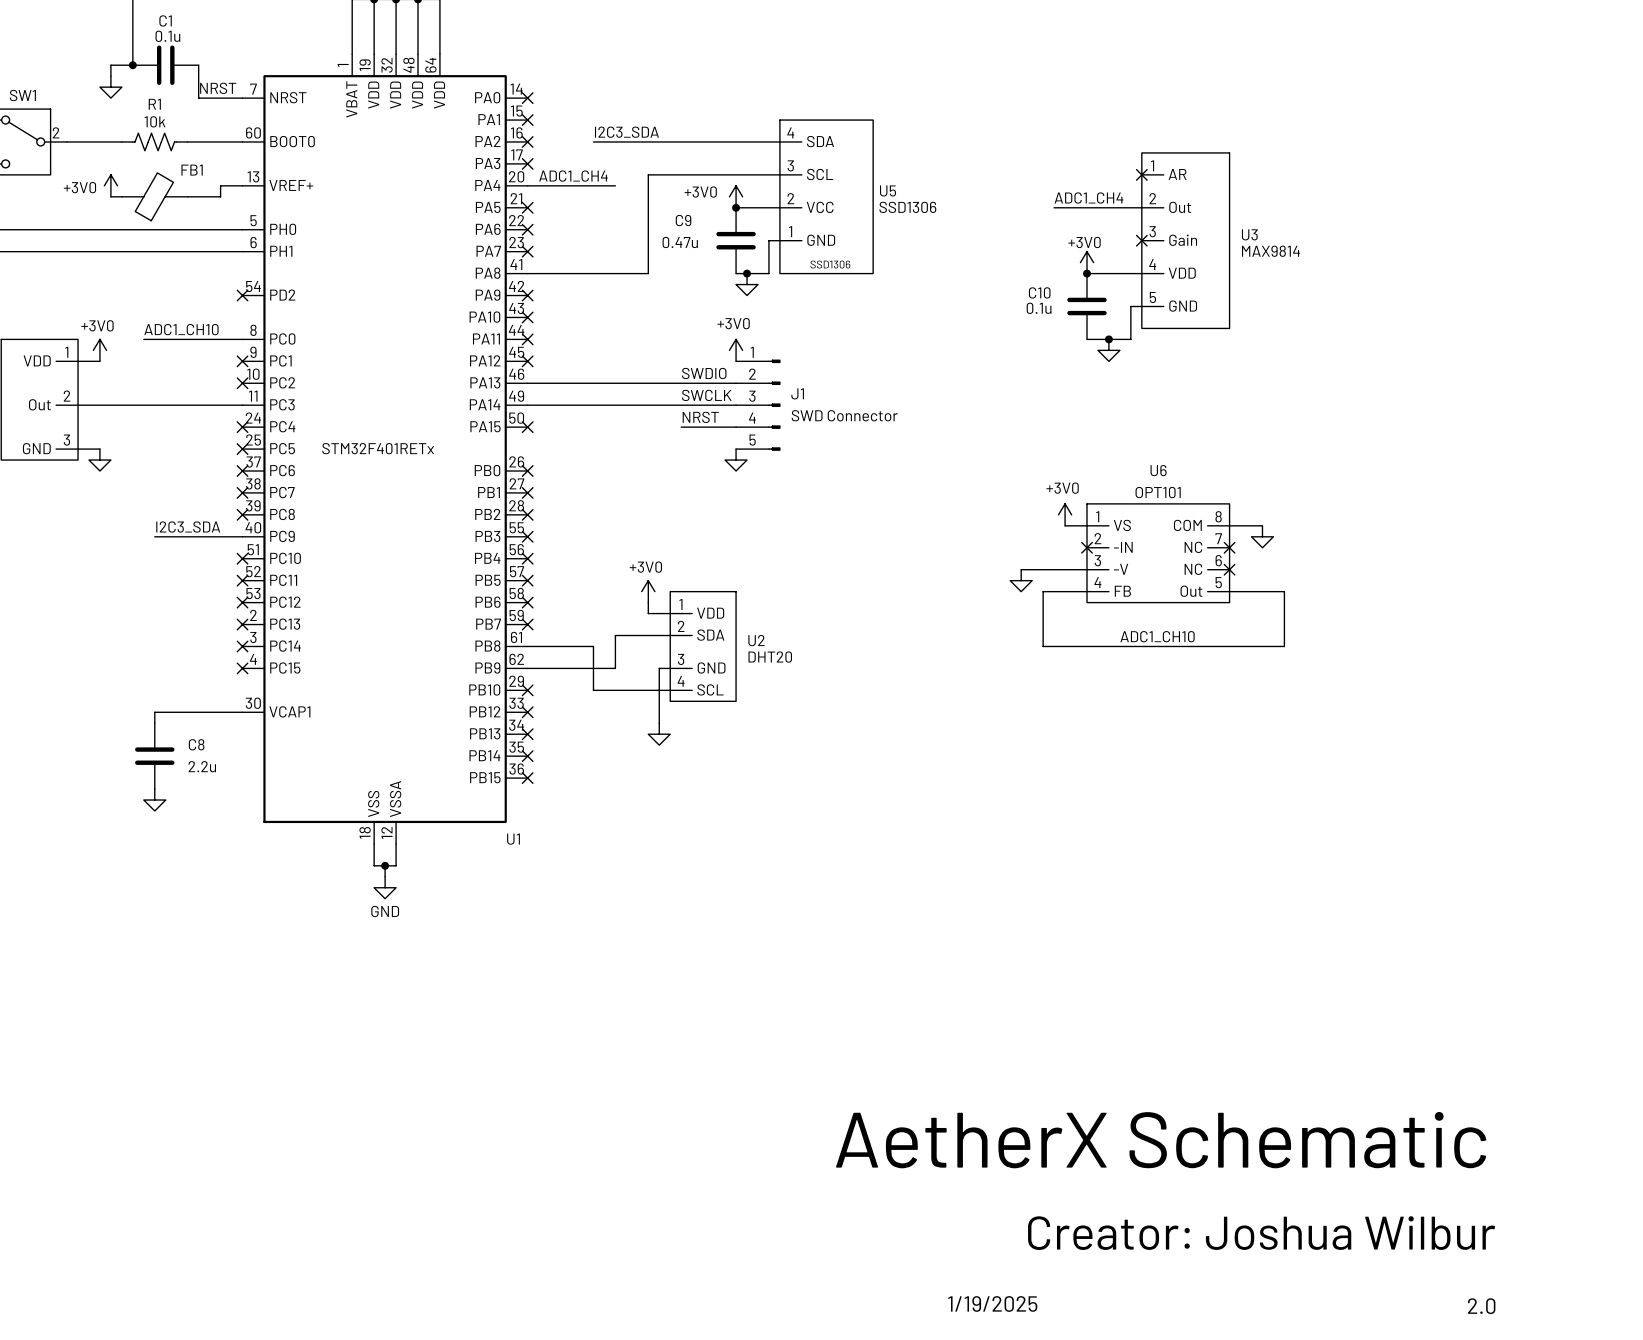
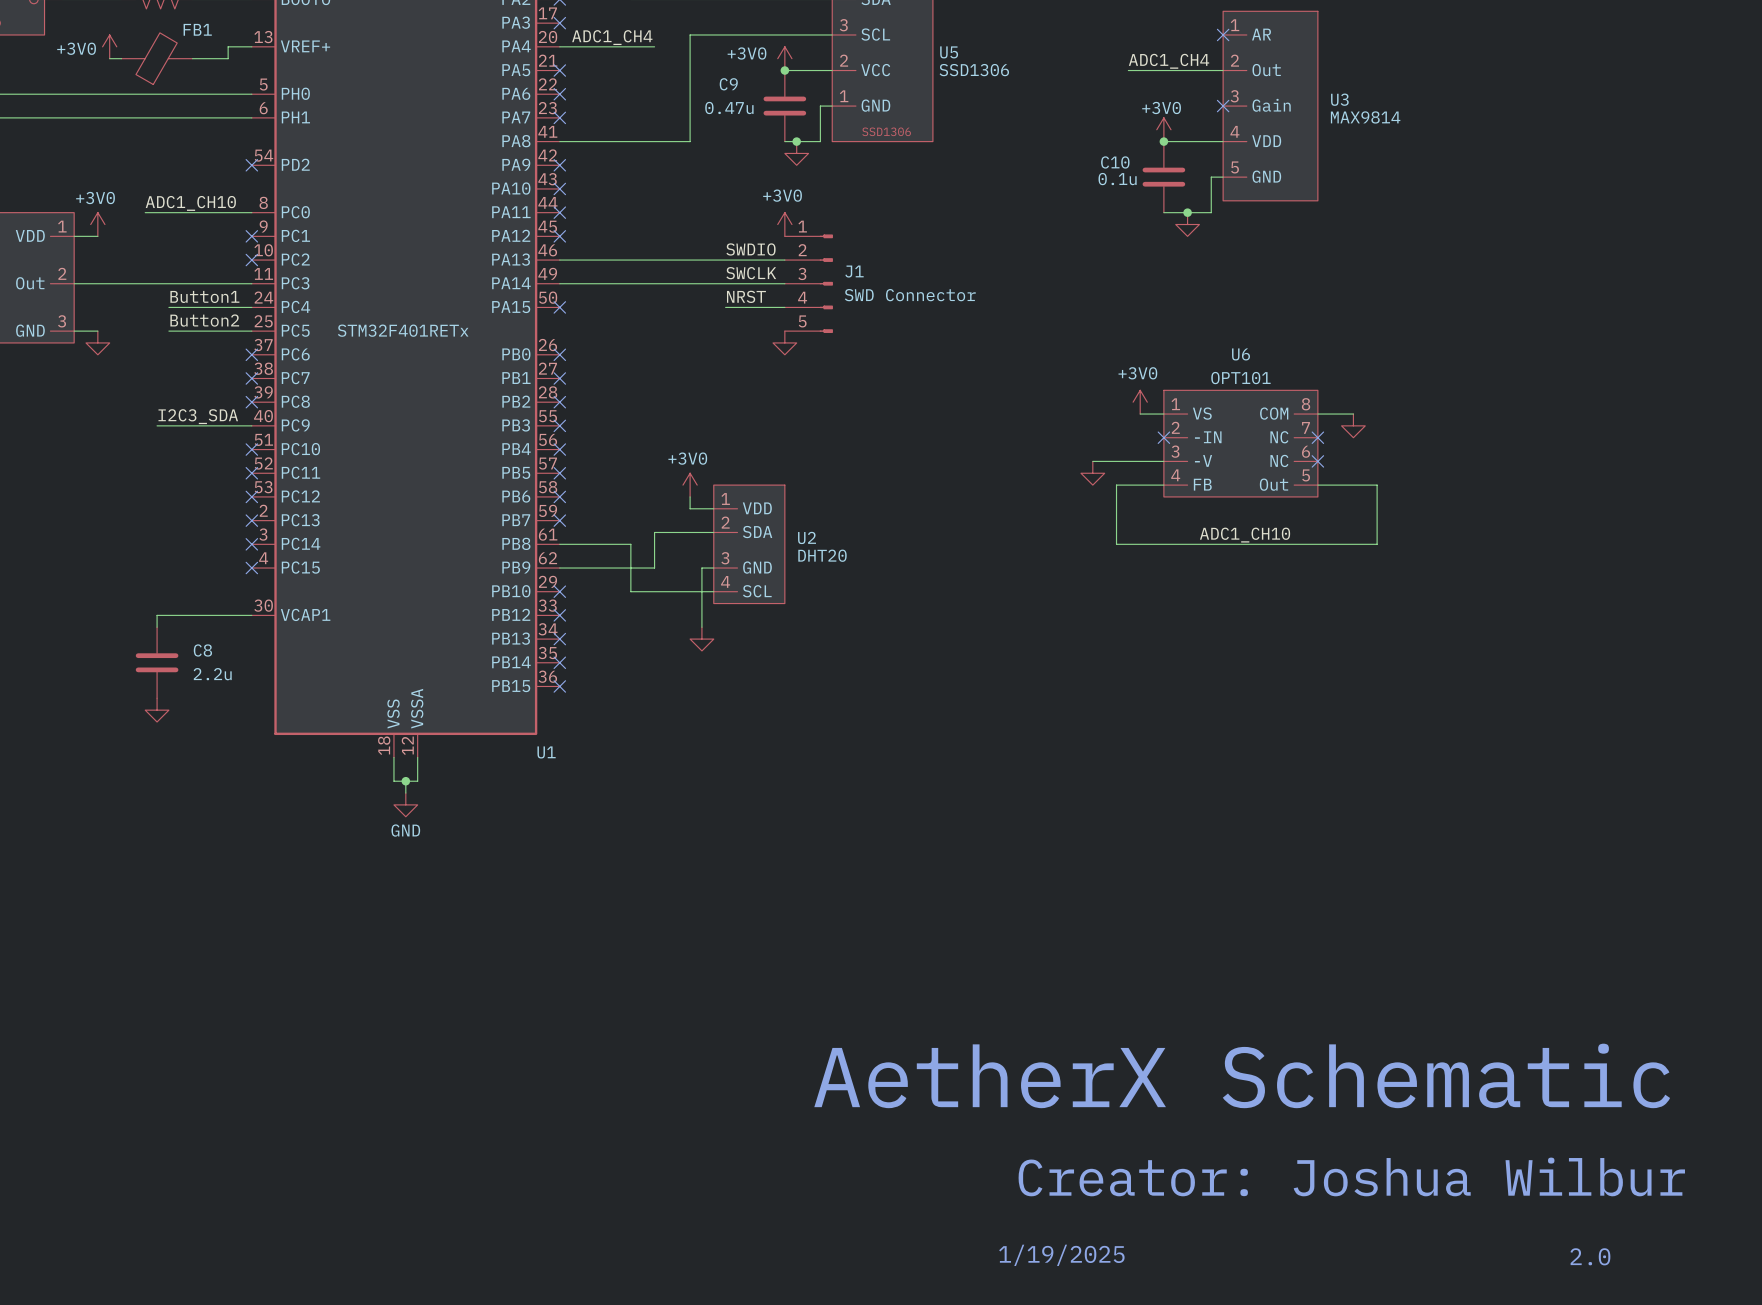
label: none -> Button1 (204, 296)
wire: none -> (168, 307) (251, 307)
no-connect mark: (242, 427) -> none
label: none -> Button2 (204, 320)
wire: none -> (168, 331) (251, 331)
no-connect mark: (242, 449) -> none

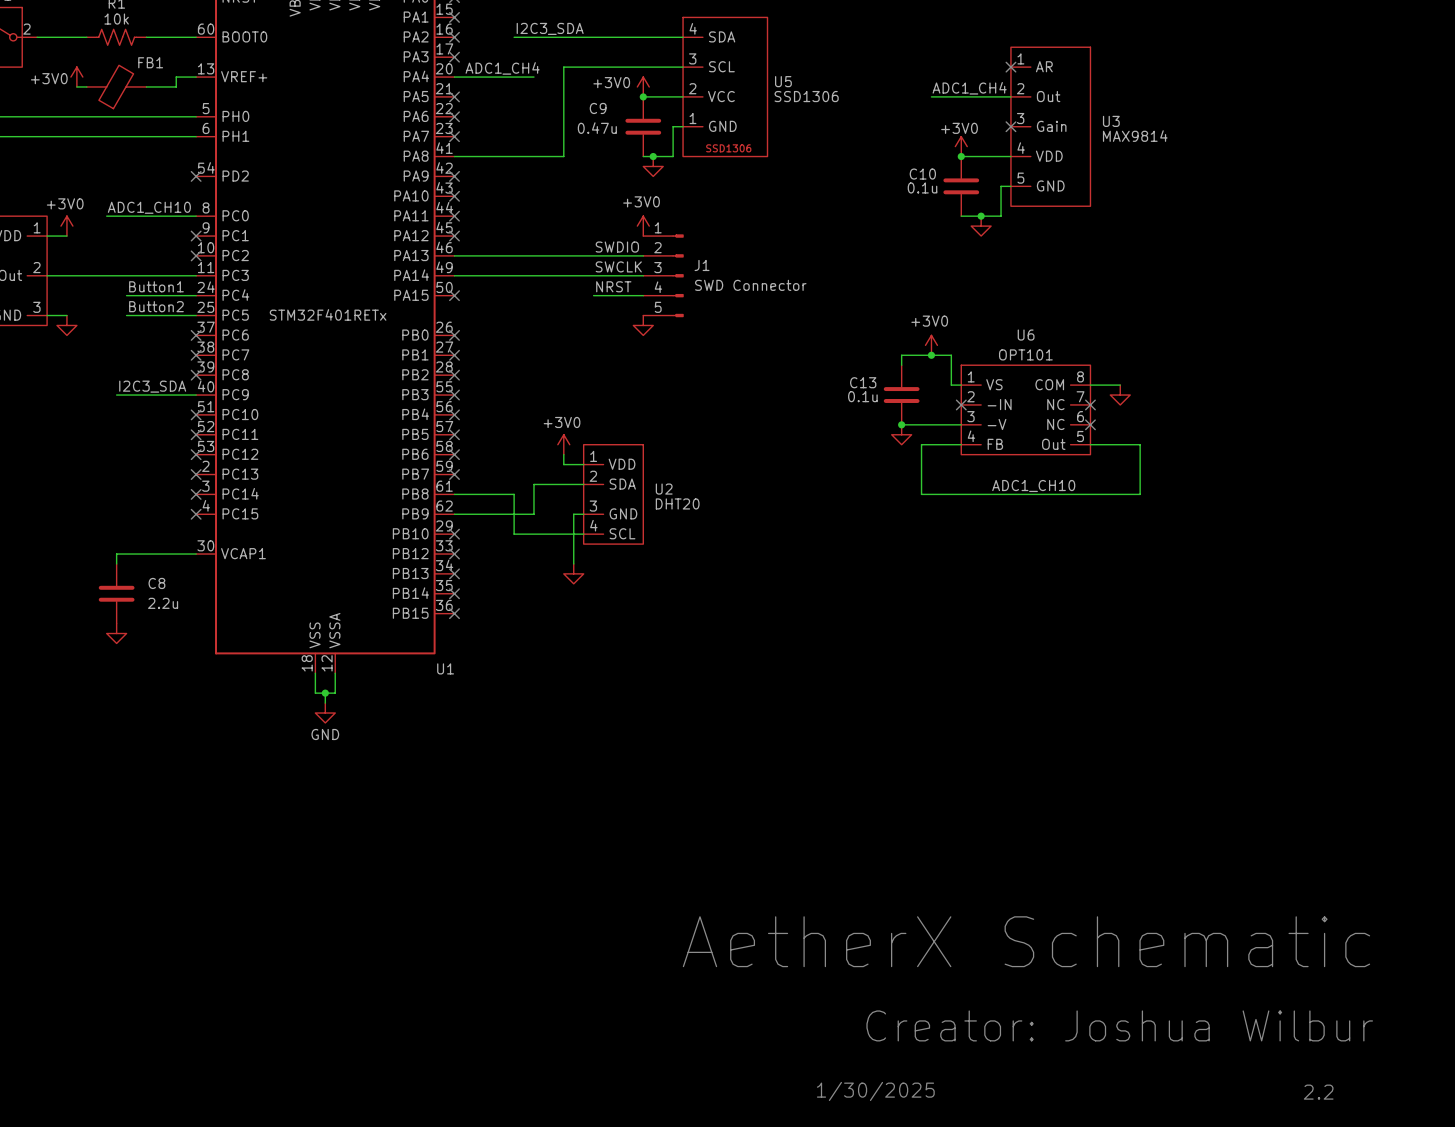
junction: none -> (931, 355)
power symbol position: +3V0 (1140, 402) -> +3V0 (931, 345)
wire: (1140, 414) (1152, 414) -> (901, 365) (901, 355) (951, 355) (951, 385)
C13: none -> 0.1u (901, 395)
junction: none -> (901, 424)
text: 1/19/2025 (1061, 1255) -> 1/30/2025 (875, 1091)
text: 2.0 (1590, 1256) -> 2.2 (1318, 1092)

